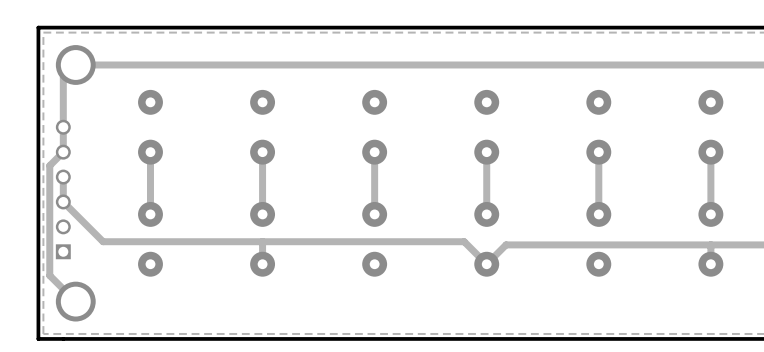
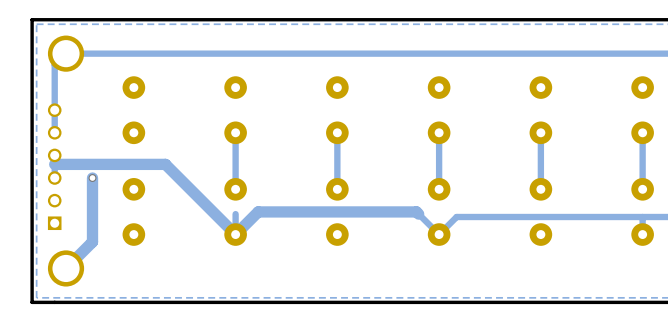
track: (63, 152) (49, 165) (49, 275) (75, 301) -> (92, 178) (92, 241) (66, 268)
track: (150, 152) (150, 214) -> none
track: (63, 201) (103, 241) (464, 241) -> (54, 164) (165, 164) (235, 234) (258, 211) (416, 211) (418, 214)
via: none -> (92, 178)

